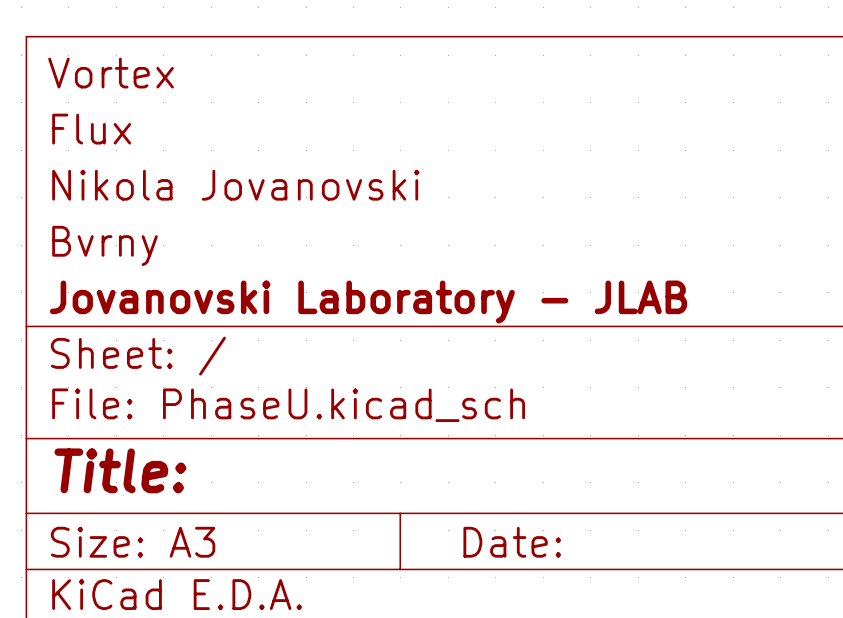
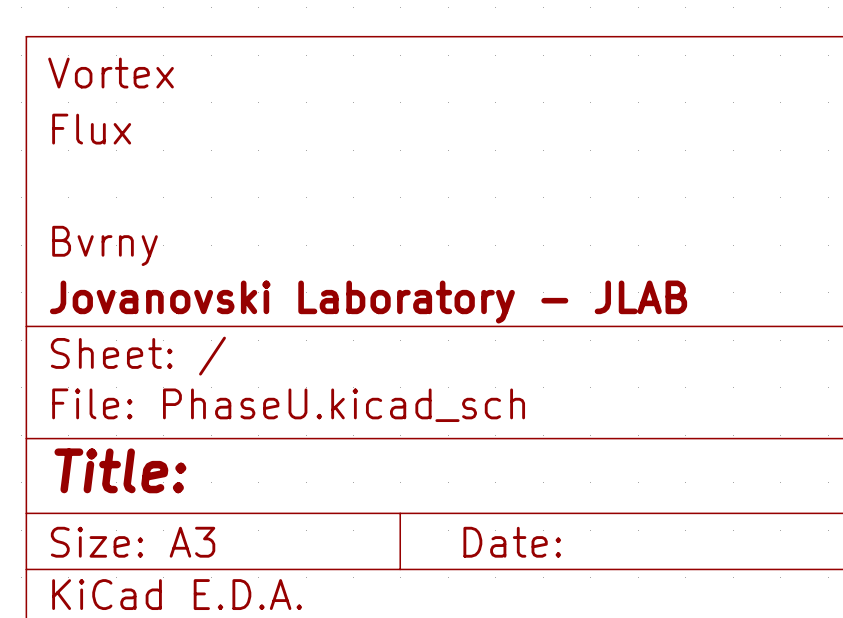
title block: Nikola Jovanovski (235, 185) -> none

